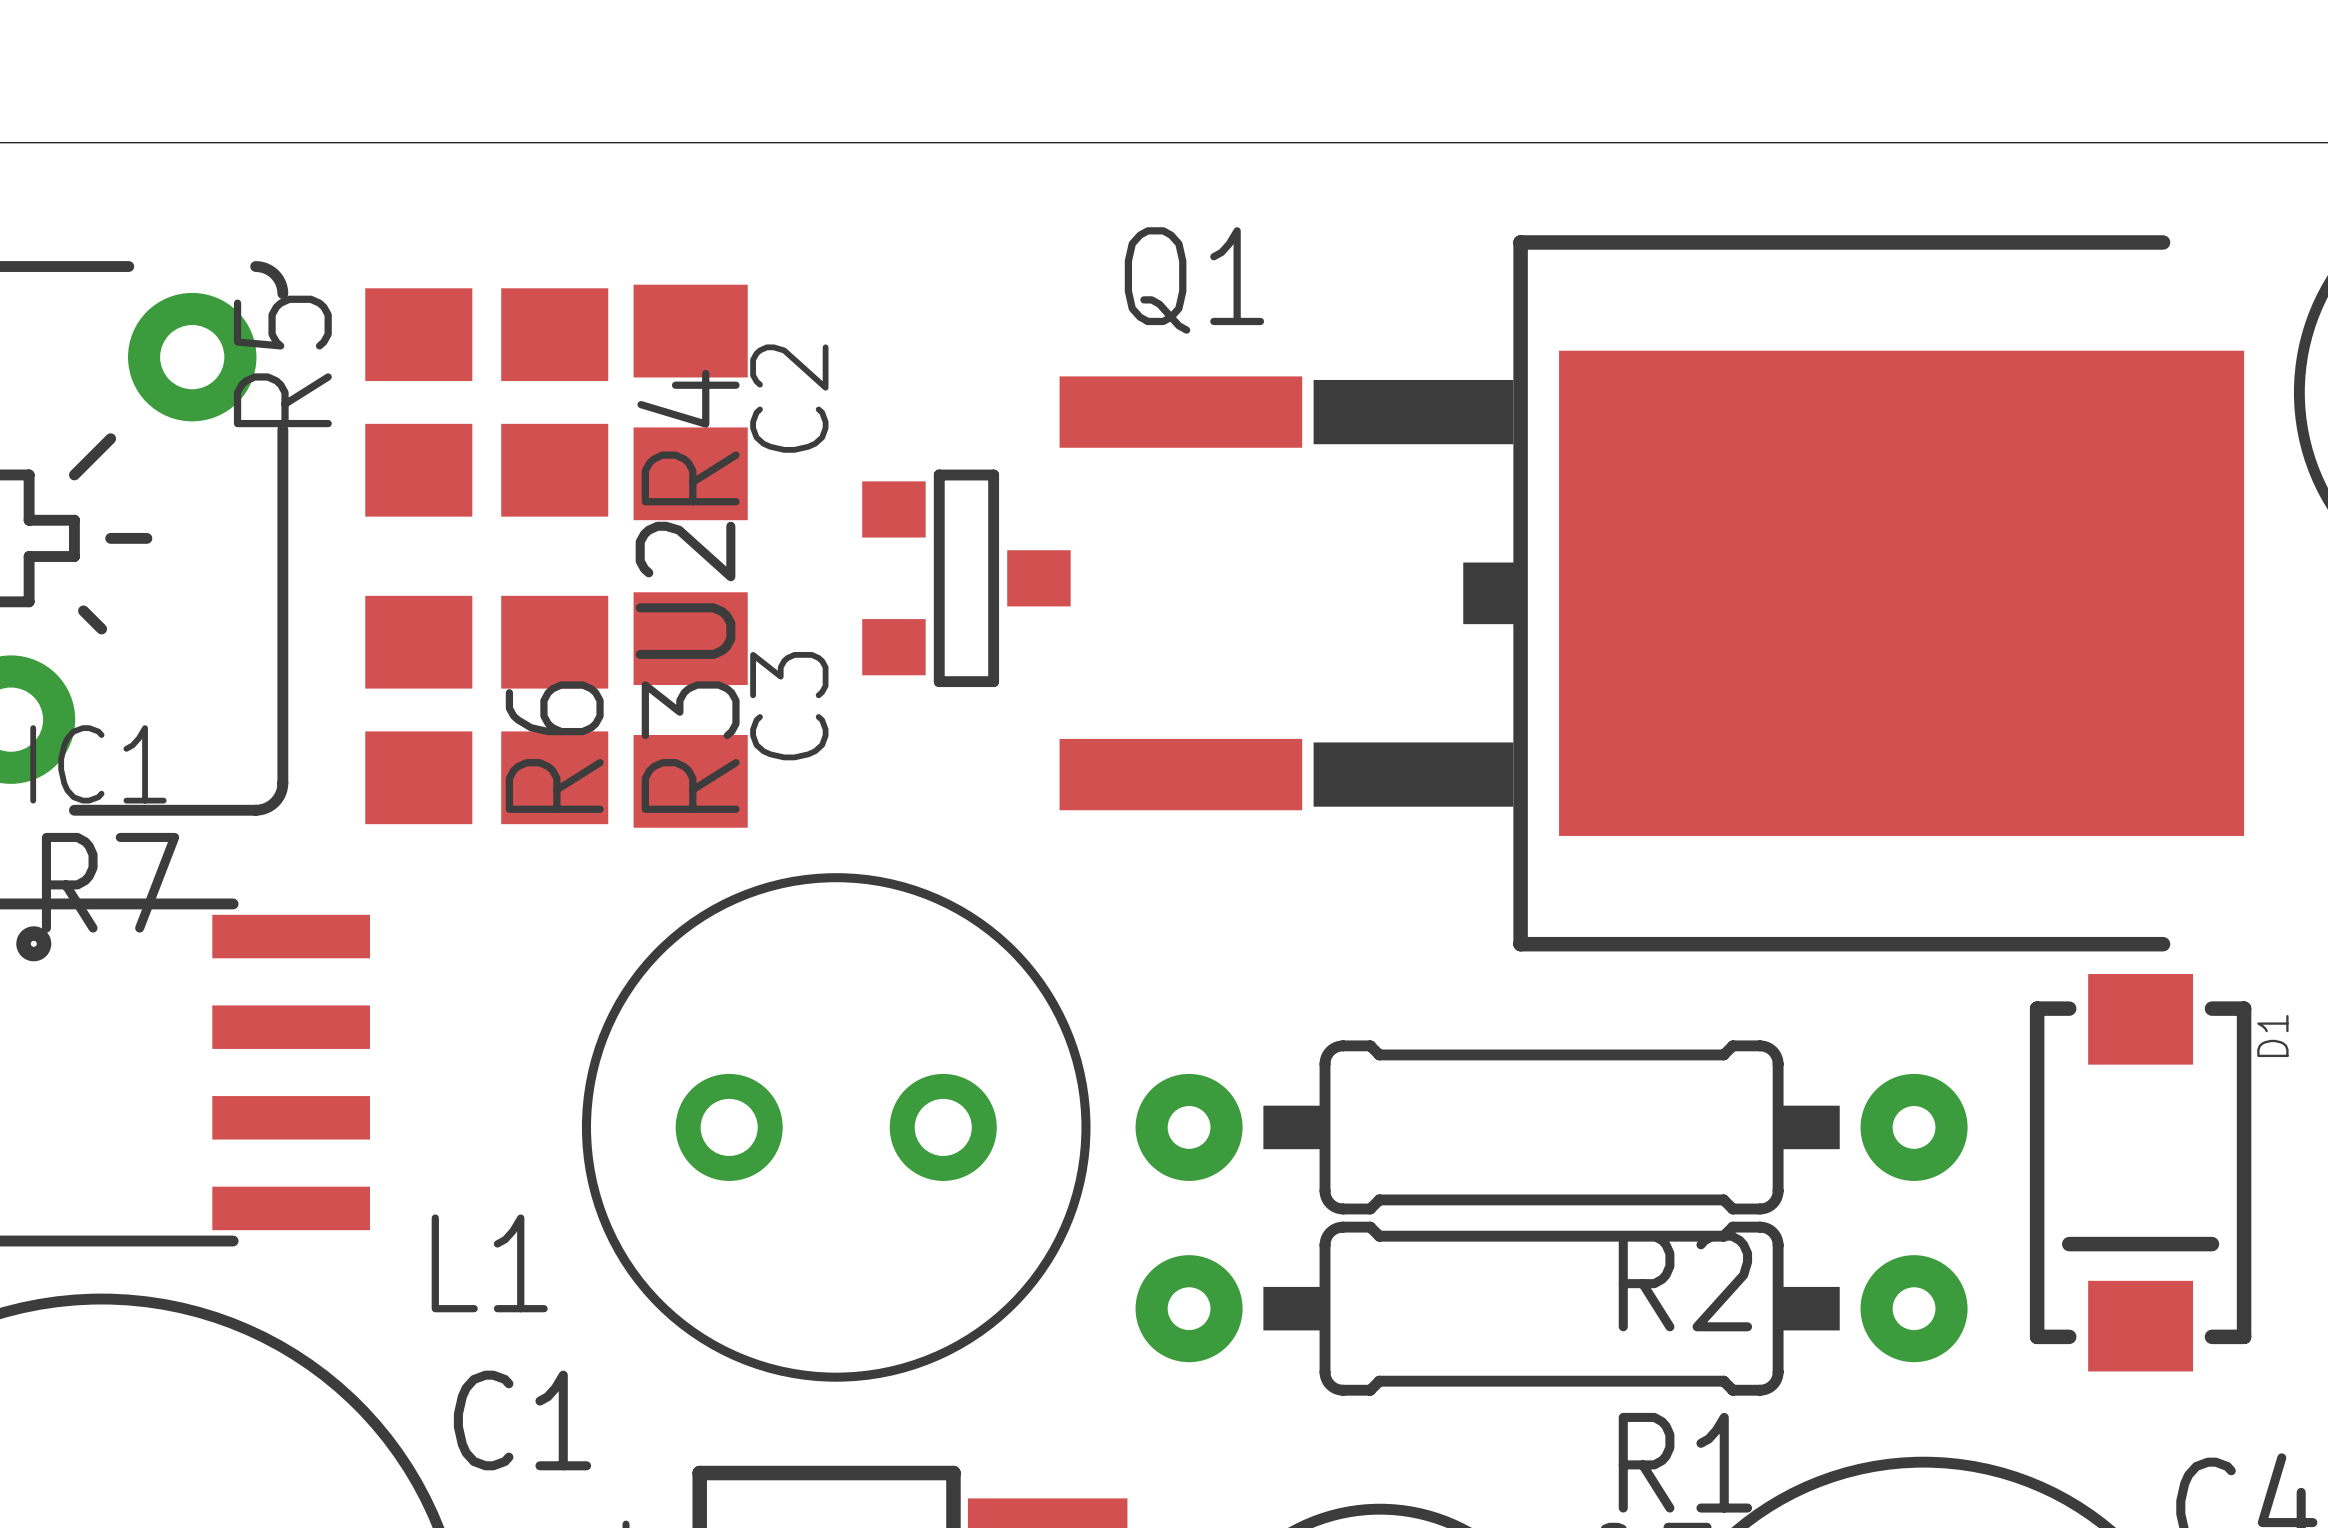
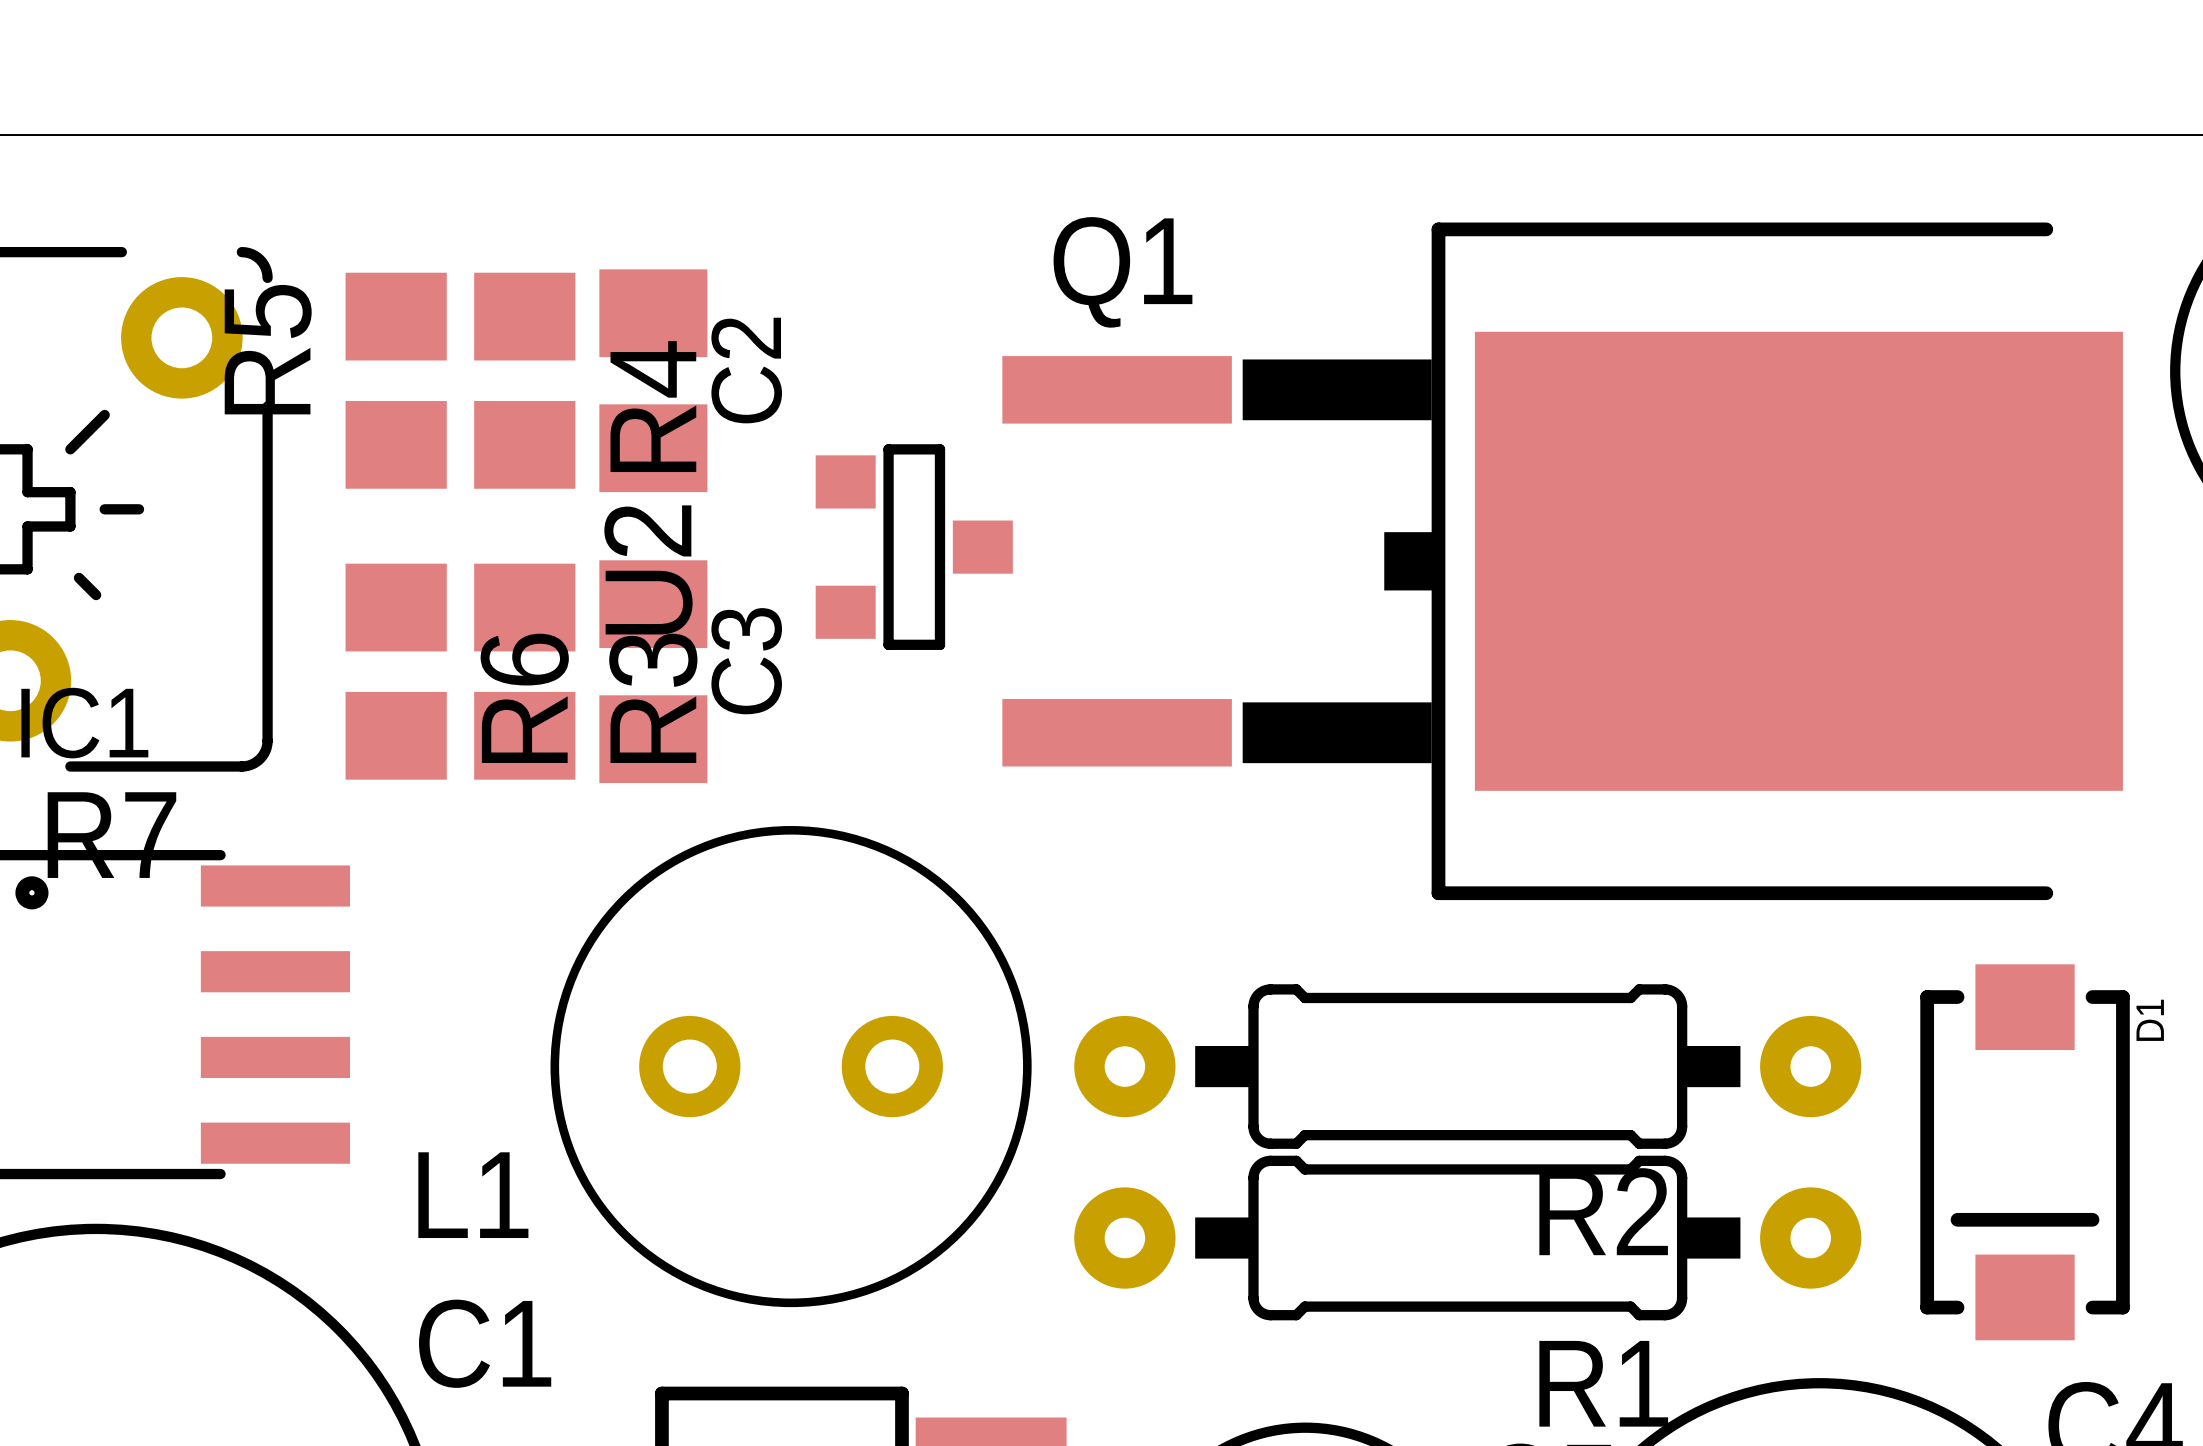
D1 position: (2140, 1172) -> (2025, 1152)

